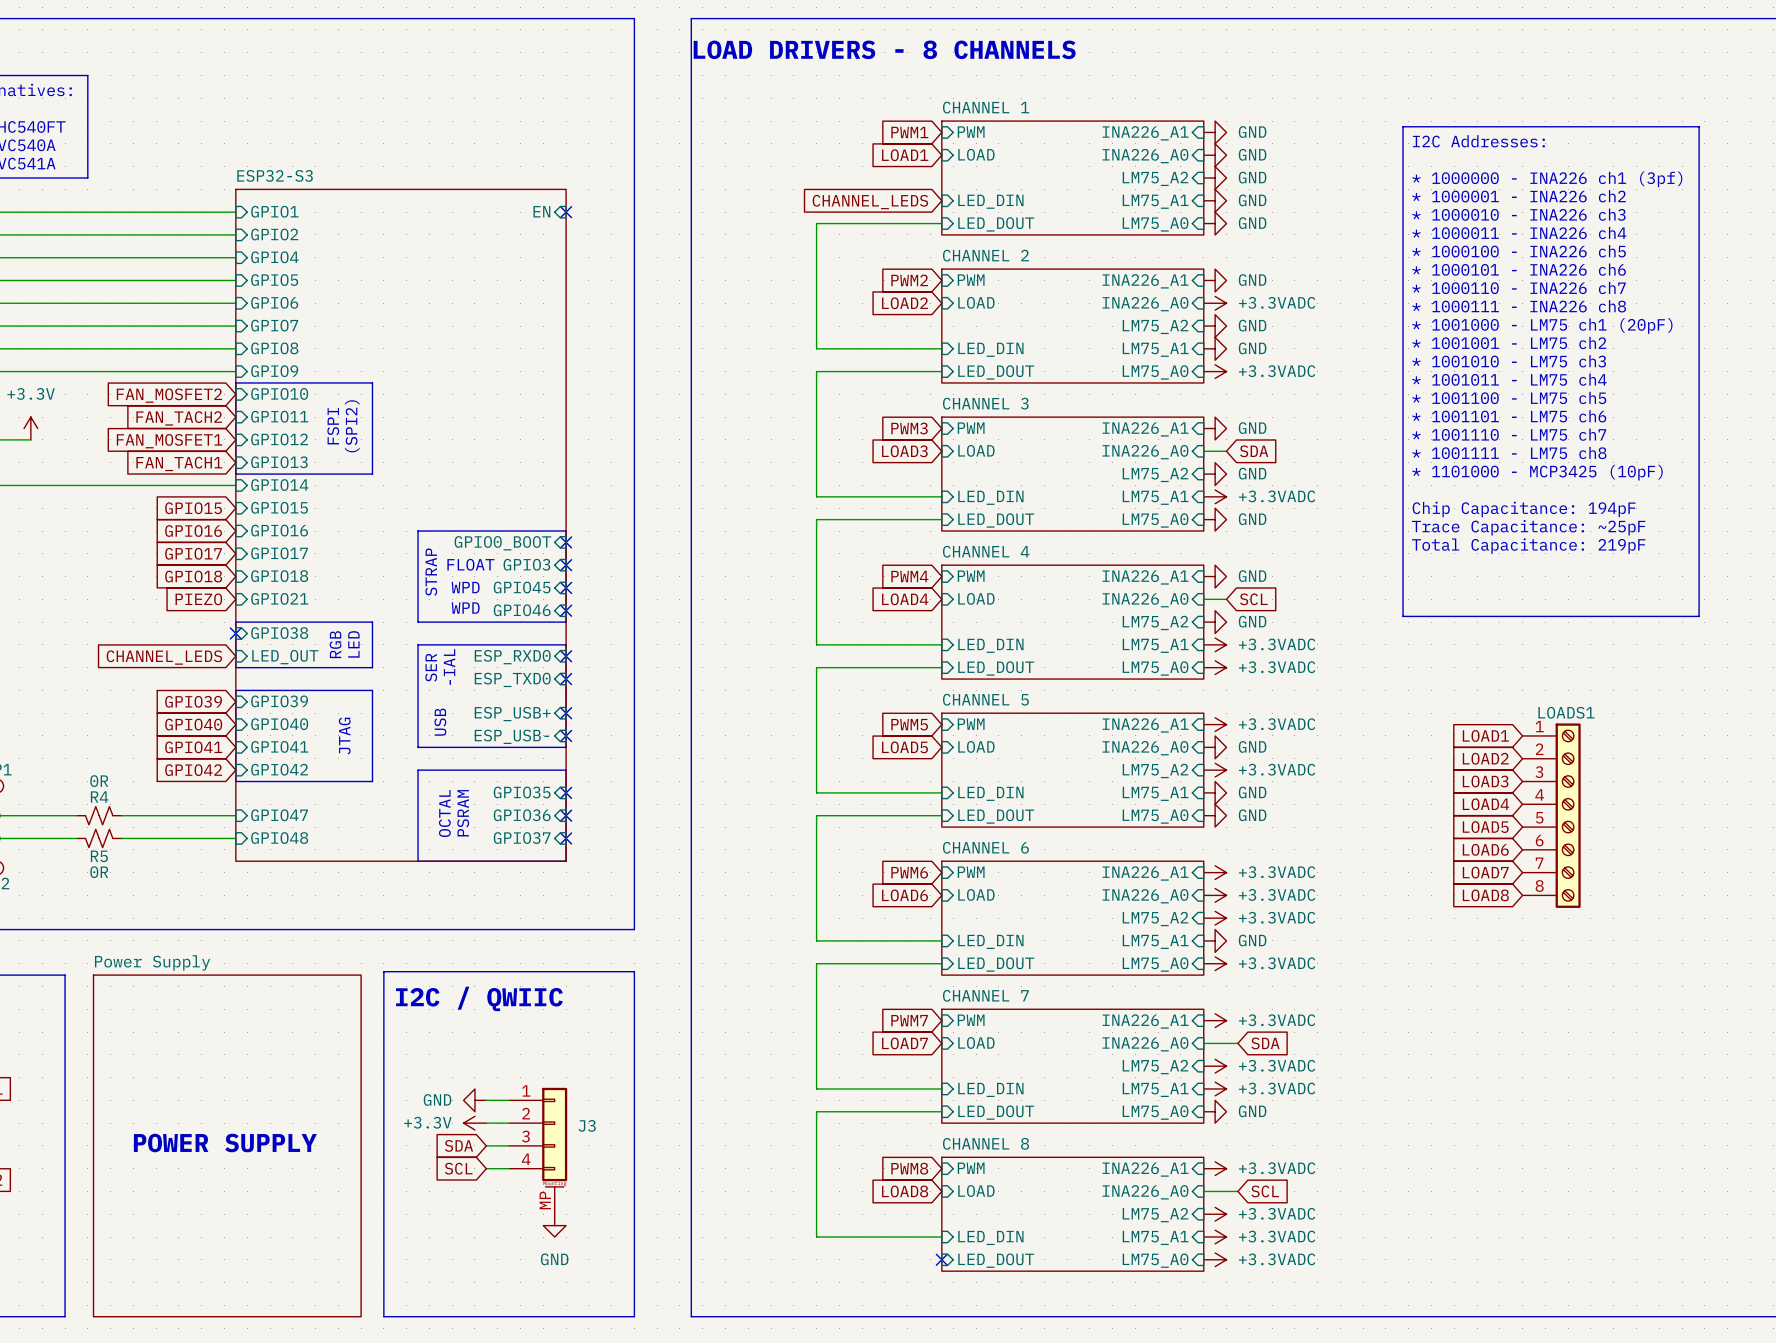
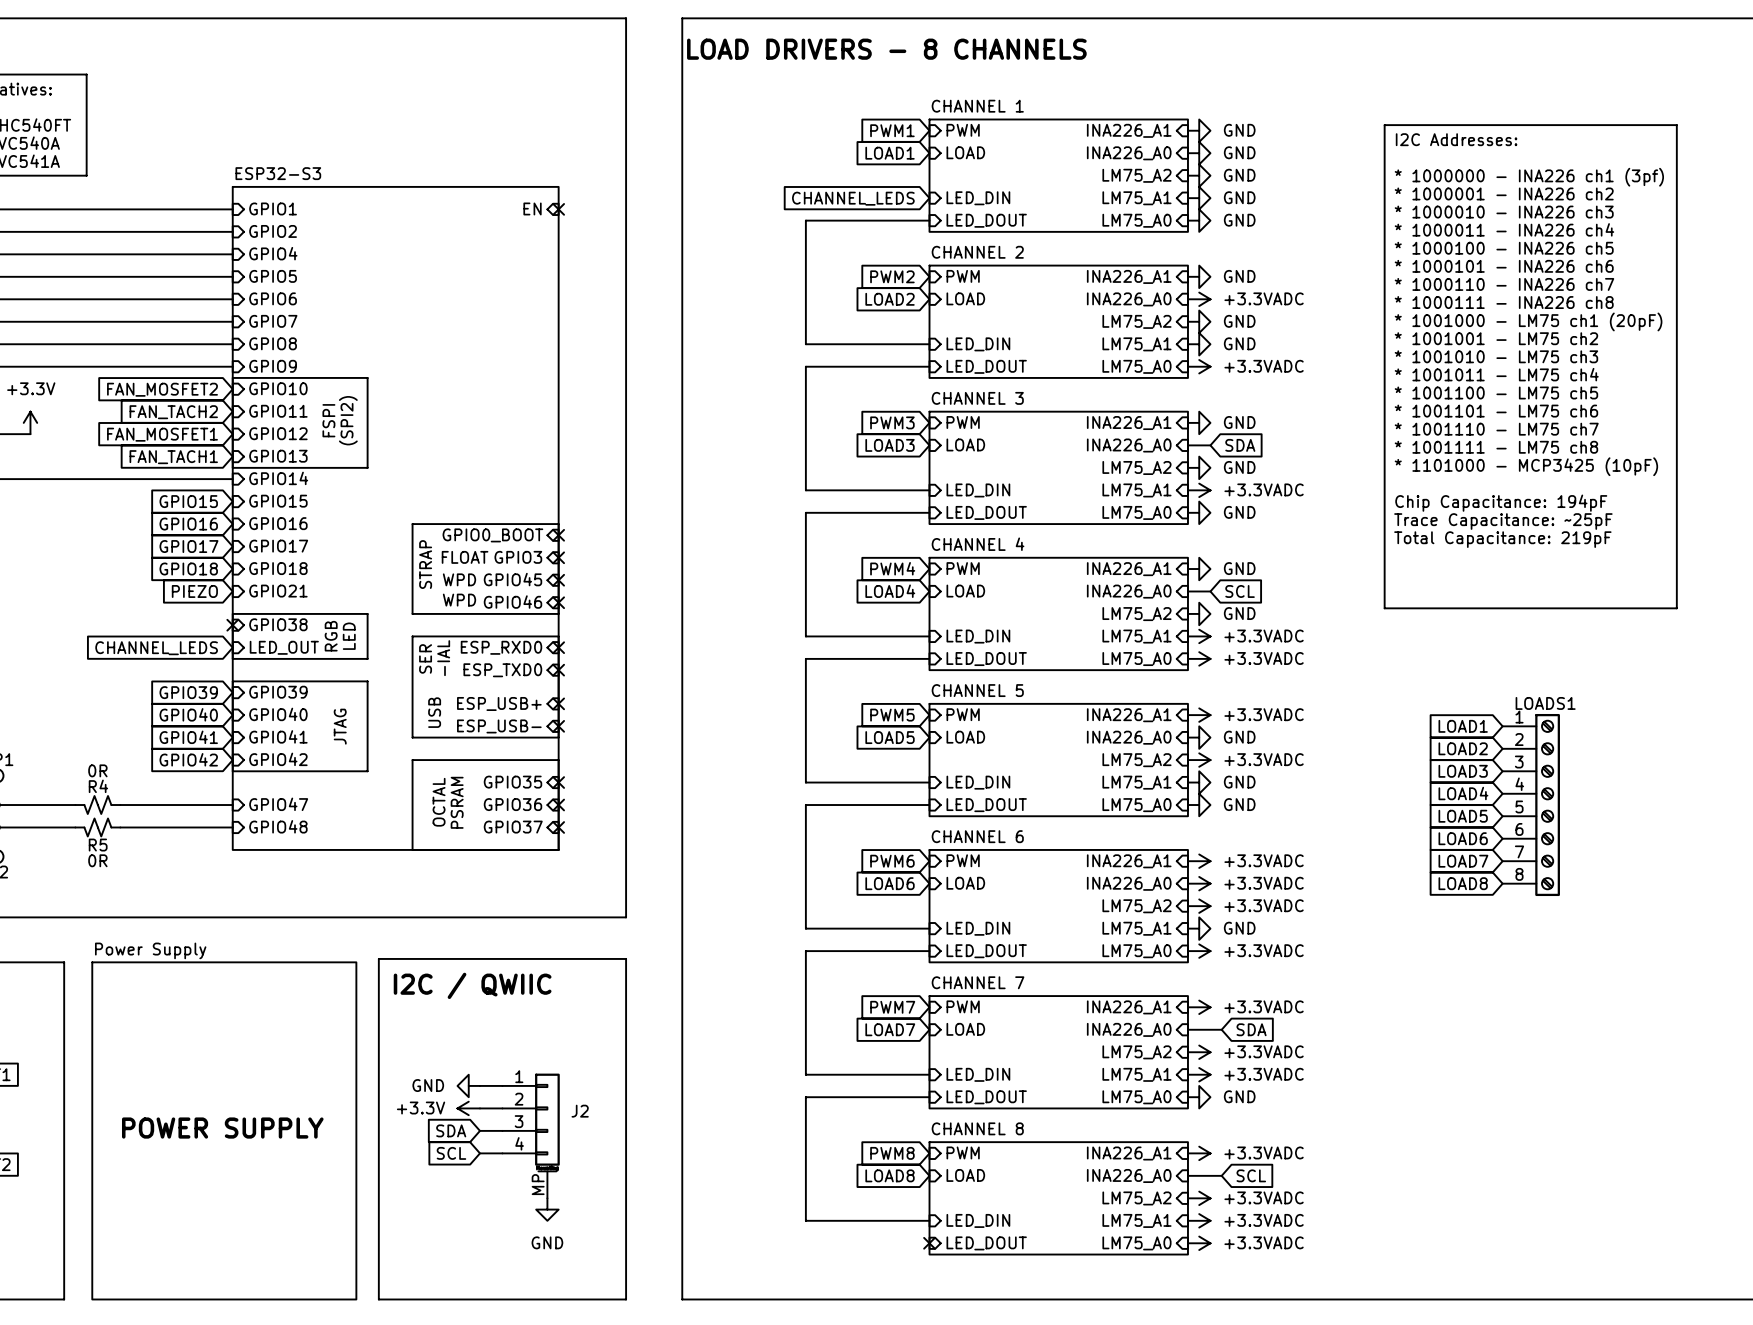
J3 name: J3 (587, 1125) -> J2 (580, 1111)

